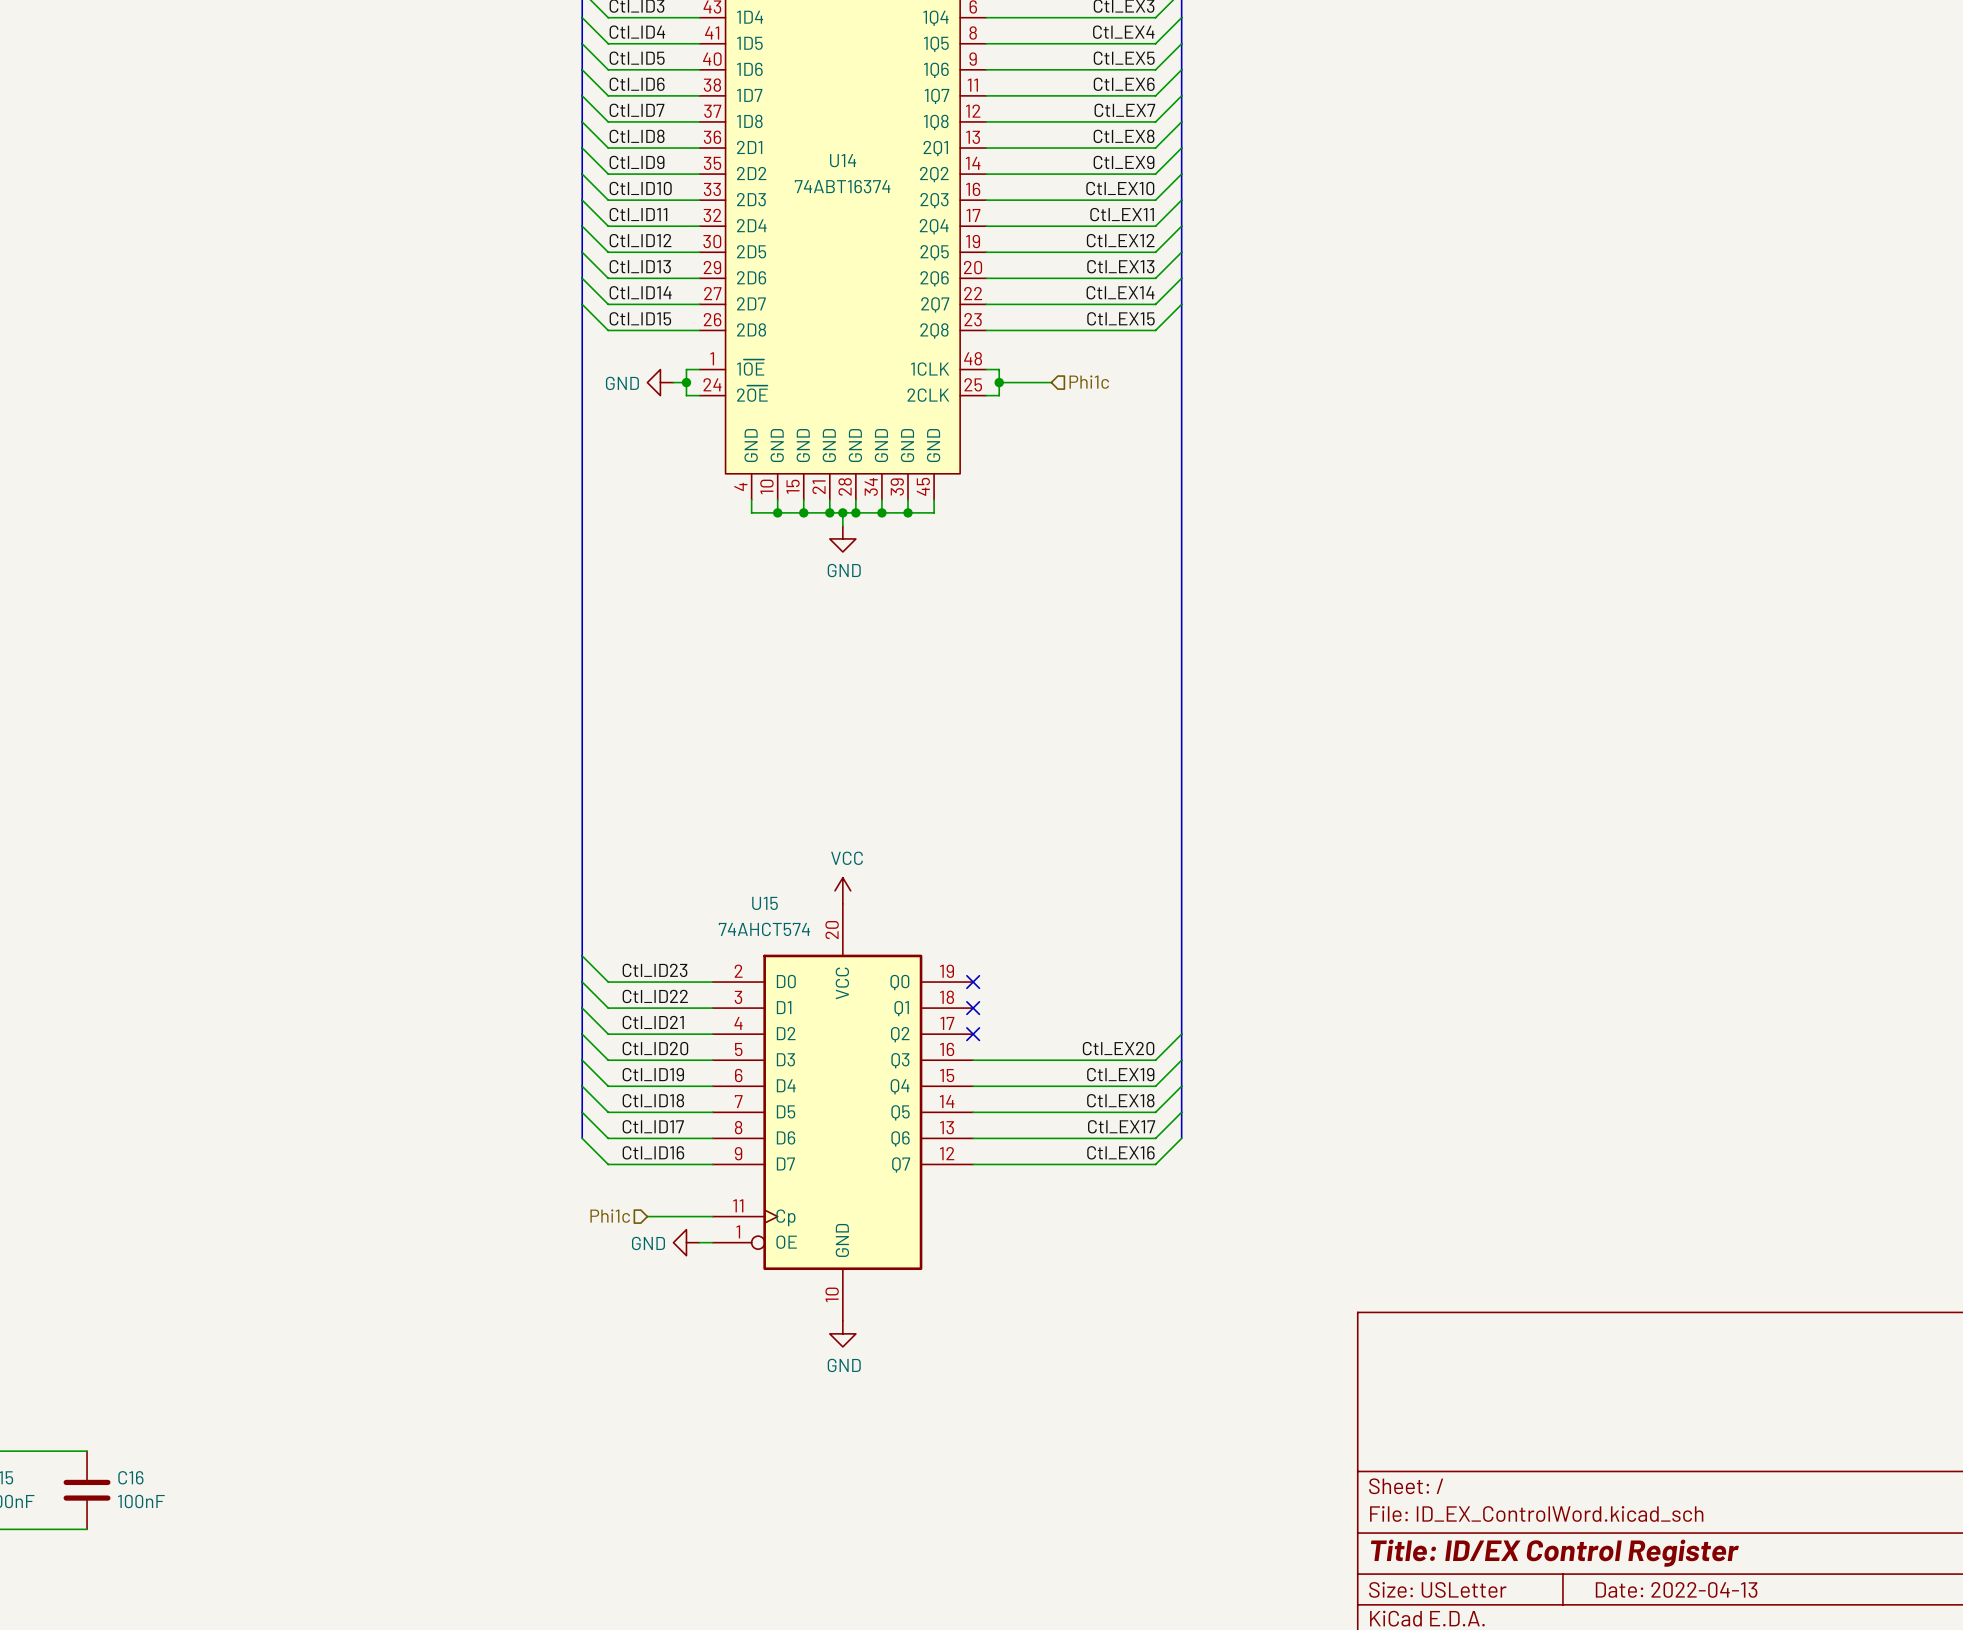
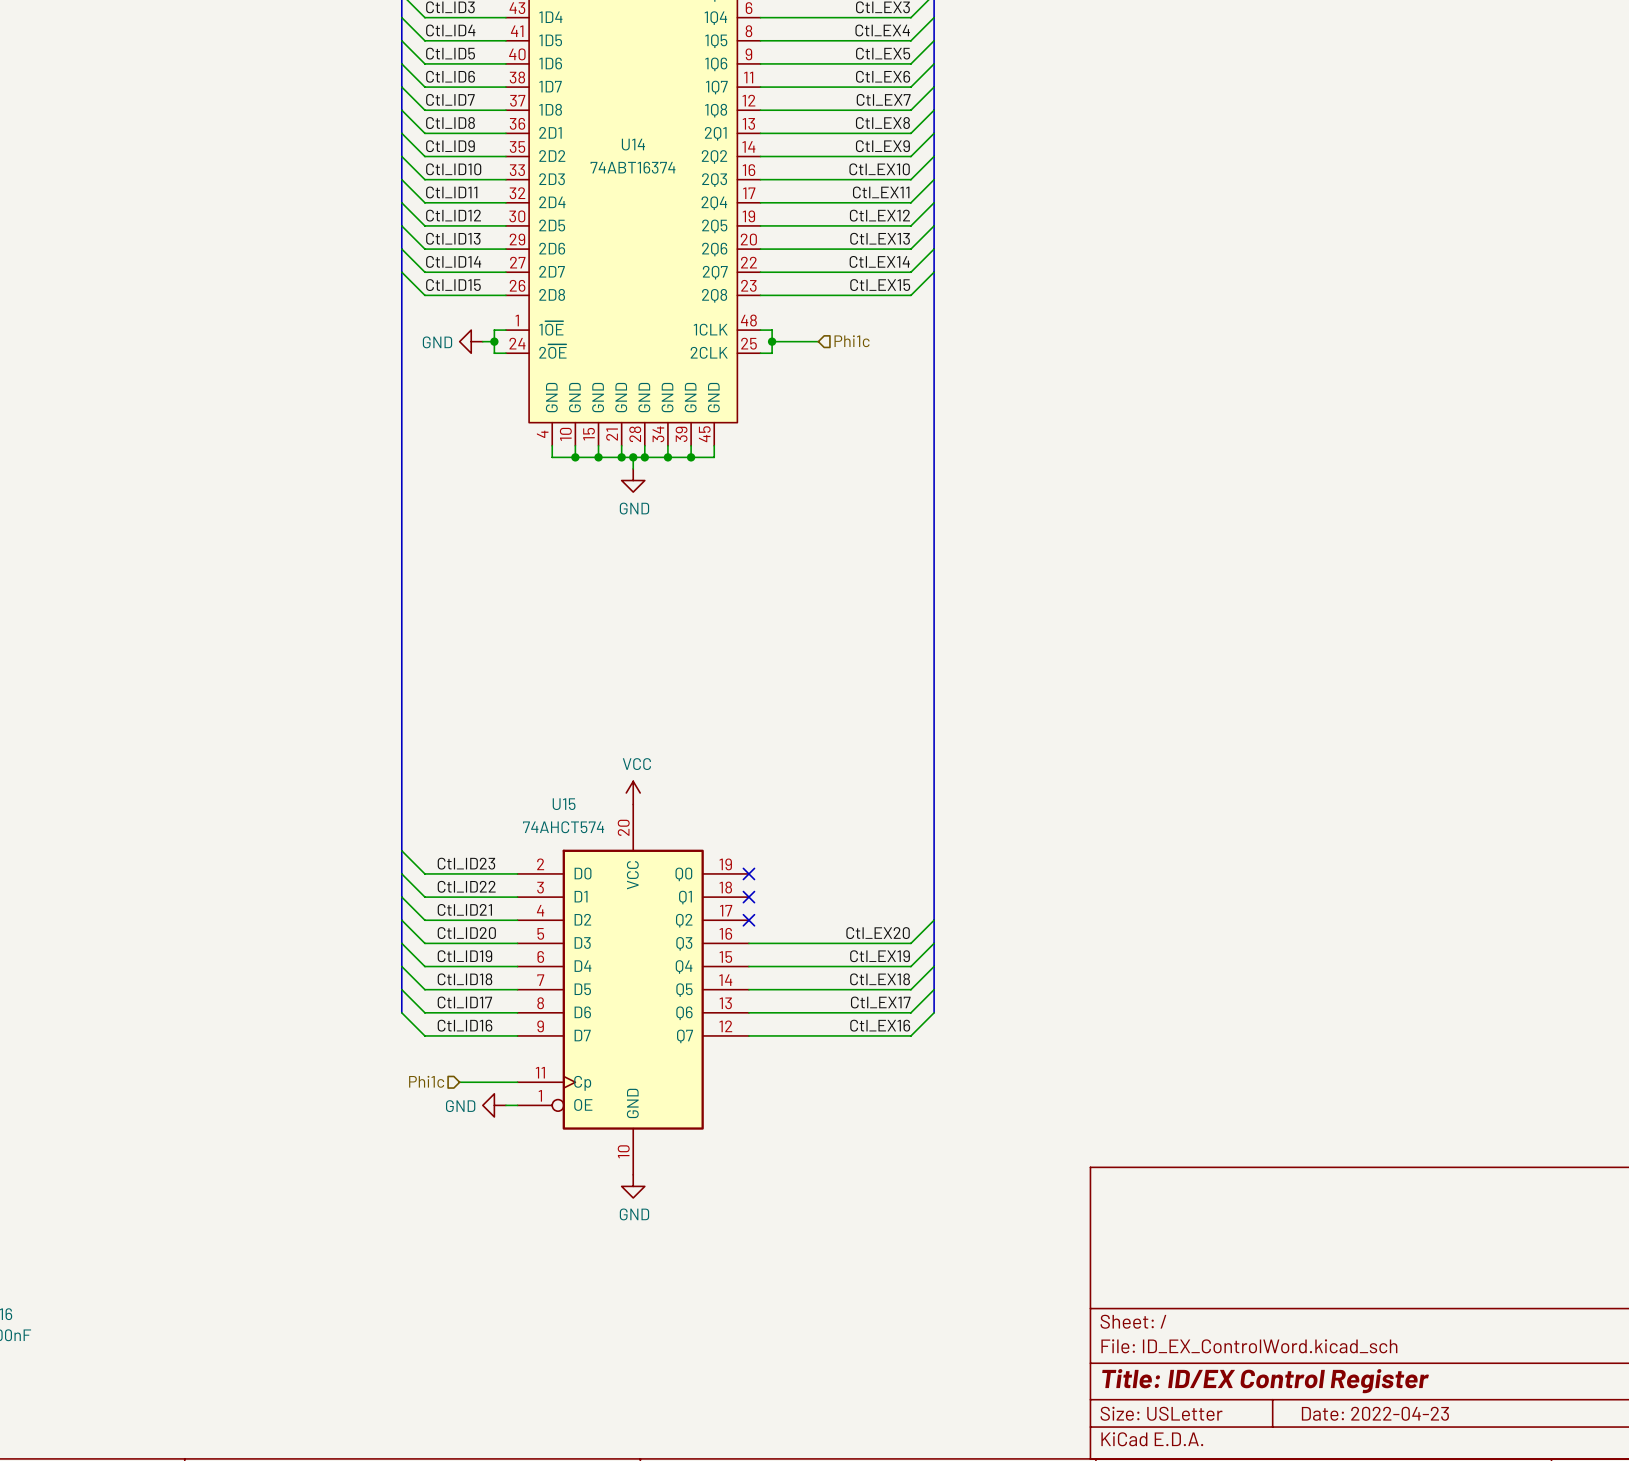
title block: Date: 2022-04-13 (1676, 1589) -> Date: 2022-04-23 (1375, 1413)

